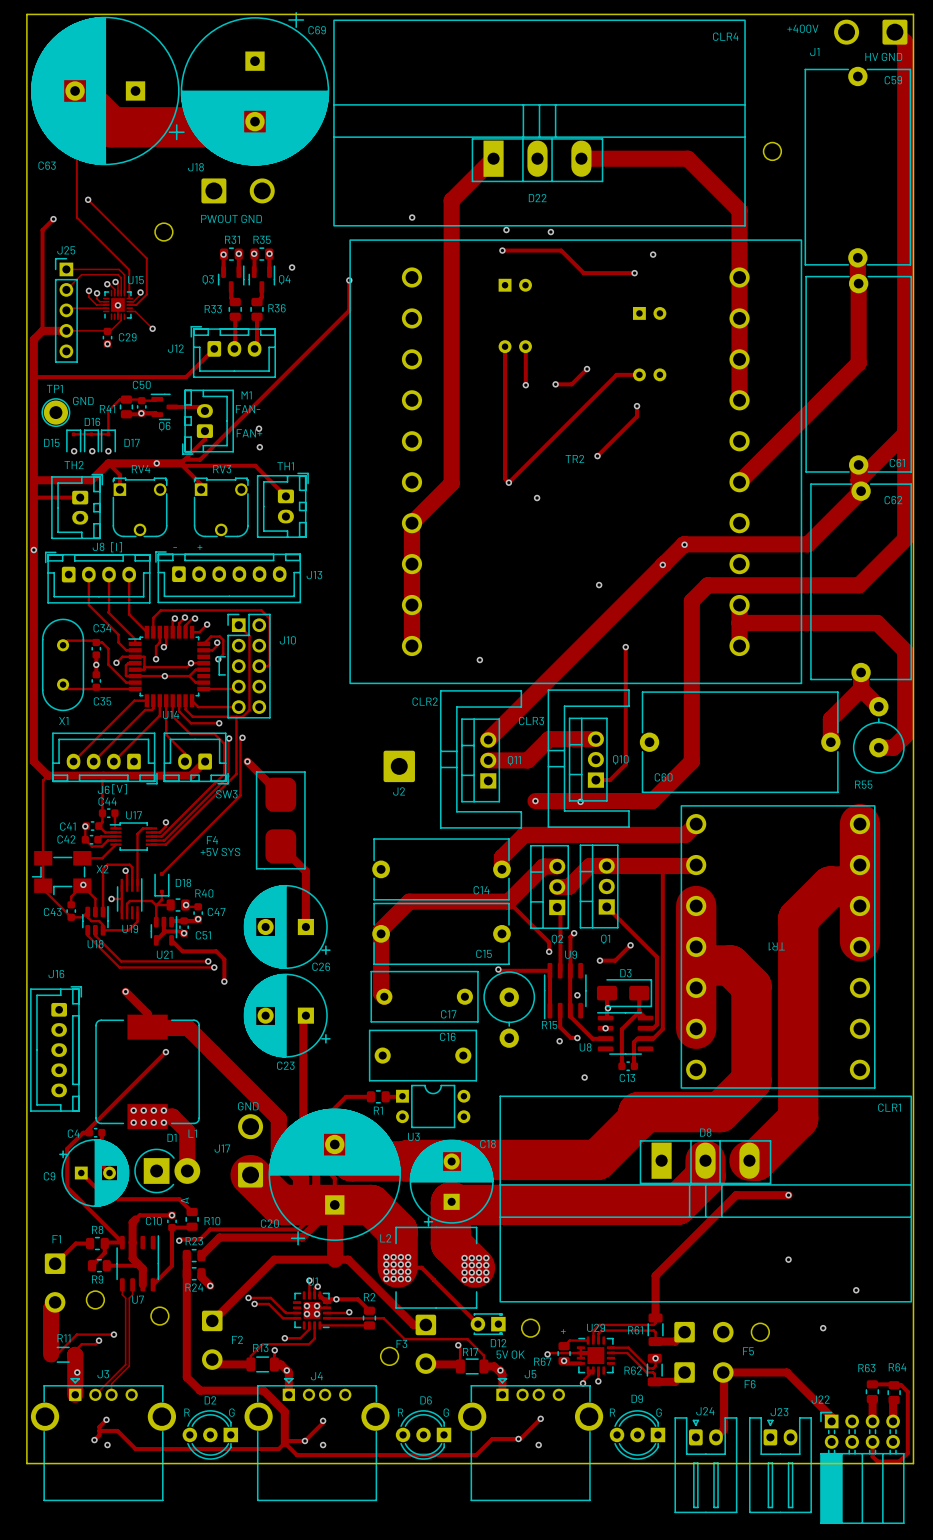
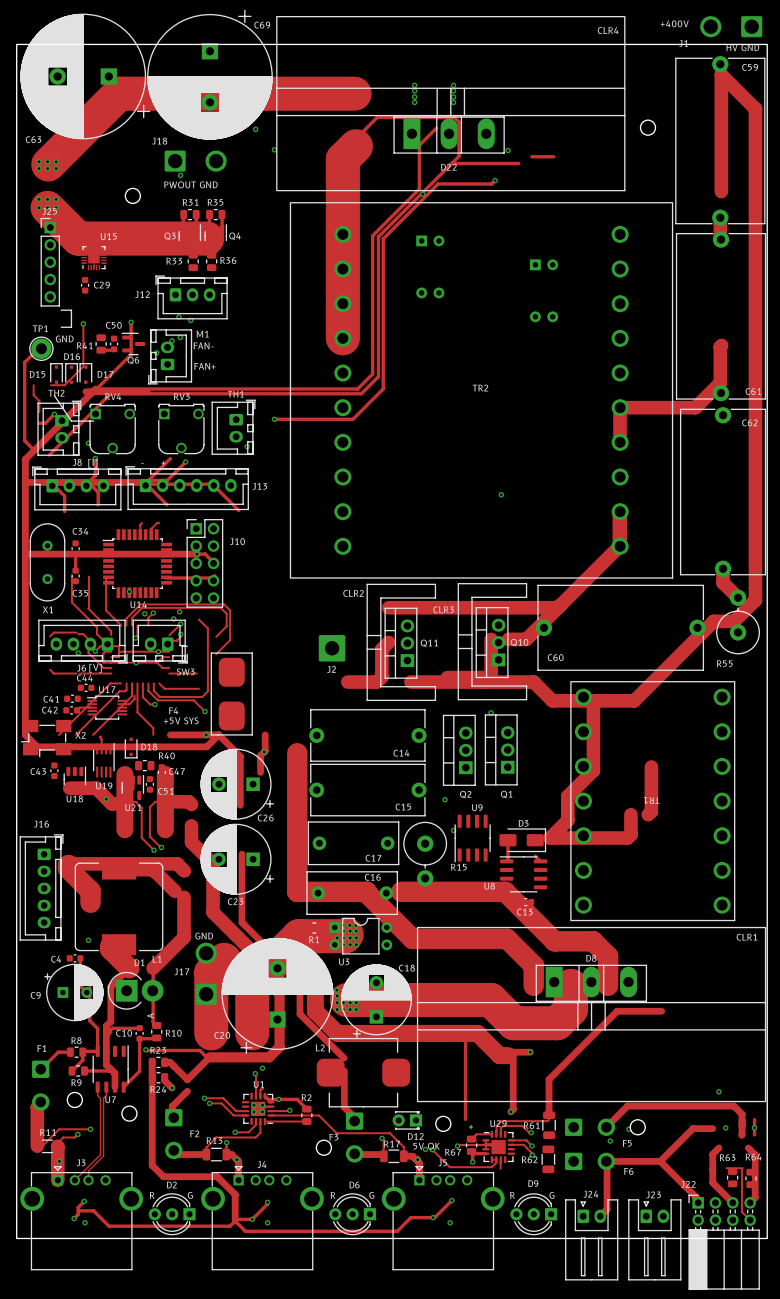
track: (894, 32) (905, 42) (905, 539) (859, 585) (707, 585) (691, 601) (691, 761) (652, 801) (581, 801) -> none
track: (75, 90) (111, 127) (249, 127) (254, 121) -> none
via: none -> (414, 85)
via: none -> (453, 85)
via: none -> (414, 90)
via: none -> (453, 90)
track: none -> (354, 93) (119, 93) (48, 164)
via: none -> (414, 96)
via: none -> (453, 96)
via: none -> (414, 102)
via: none -> (453, 102)
track: none -> (436, 117) (377, 117) (348, 146)
track: (76, 144) (76, 217) (129, 269) (129, 298) -> none
track: none -> (436, 128) (419, 145) (419, 189) (372, 235) (372, 373) (357, 389) (96, 389) (131, 354) (131, 322)
via: none -> (255, 129)
track: (493, 158) (451, 200) (451, 483) (411, 523) (411, 645) -> none
track: (581, 158) (687, 158) (739, 210) (739, 400) -> none
track: none -> (355, 146) (342, 159) (342, 338)
via: none -> (274, 149)
via: none -> (508, 150)
track: none -> (531, 156) (553, 156)
via: none -> (39, 161)
via: none -> (47, 161)
via: none -> (56, 161)
track: none -> (452, 163) (518, 163)
via: none -> (39, 168)
via: none -> (47, 168)
via: none -> (56, 168)
via: (88, 199) -> none
track: (88, 200) (146, 258) (146, 294) (136, 304) (129, 304) -> none
via: none -> (180, 175)
track: none -> (495, 180) (491, 183) (438, 183) (383, 238) (383, 389) (352, 419) (274, 419)
via: none -> (495, 180)
via: (412, 217) -> none
track: (53, 219) (42, 230) (42, 330) -> none
via: (53, 219) -> none
track: none -> (721, 191) (721, 74) (755, 108) (755, 600) (734, 621) (713, 621) (634, 700) (552, 700) (533, 682) (410, 682)
via: (550, 232) -> none
via: none -> (39, 199)
via: none -> (47, 199)
via: none -> (56, 199)
via: none -> (39, 207)
track: none -> (47, 207) (78, 238) (207, 238)
via: none -> (47, 207)
via: none -> (56, 207)
track: (502, 250) (561, 250) (583, 273) (634, 273) -> none
via: (502, 250) -> none
via: (238, 253) -> none
via: (254, 253) -> none
via: (269, 253) -> none
via: (223, 254) -> none
via: (653, 254) -> none
via: (292, 267) -> none
track: (66, 269) (119, 269) (124, 274) (124, 293) -> none
via: (634, 273) -> none
track: (349, 280) (349, 310) (200, 459) (184, 459) -> none
via: (349, 280) -> none
via: (115, 282) -> none
track: (117, 282) (115, 282) (117, 282) (117, 293) -> none
track: (858, 283) (858, 363) (739, 482) -> none
track: (107, 284) (114, 289) (114, 293) -> none
via: (107, 284) -> none
track: (66, 289) (81, 274) (117, 274) (121, 277) (121, 293) -> none
track: (88, 290) (88, 297) (96, 304) (106, 304) -> none
via: (88, 290) -> none
track: (140, 292) (133, 301) (129, 301) -> none
via: (140, 292) -> none
track: (97, 293) (97, 298) (99, 301) (106, 301) -> none
via: (97, 293) -> none
via: (117, 305) -> none
track: (68, 308) (106, 308) -> none
track: (129, 311) (135, 311) (152, 328) -> none
track: (121, 316) (121, 320) (110, 330) (42, 330) -> none
track: (235, 316) (235, 348) -> none
track: (257, 316) (257, 346) -> none
via: (152, 328) -> none
track: (42, 330) (33, 339) (33, 761) (47, 775) -> none
via: (107, 344) -> none
track: (505, 346) (505, 478) (508, 482) (616, 374) (639, 374) -> none
track: (525, 346) (525, 385) -> none
track: (214, 348) (186, 377) (33, 377) -> none
line: none -> (61, 310) (71, 310) (71, 327) (61, 327)
track: (587, 369) (571, 384) (555, 384) -> none
via: (587, 369) -> none
via: none -> (178, 317)
via: none -> (190, 320)
via: none -> (131, 322)
track: none -> (83, 323) (83, 366) (64, 385) (50, 385)
via: none -> (83, 323)
via: (555, 384) -> none
via: (525, 385) -> none
track: (140, 399) (119, 399) (108, 410) (108, 434) (73, 434) -> none
track: (157, 399) (141, 400) -> none
via: none -> (180, 337)
via: none -> (172, 340)
track: (172, 406) (200, 406) (204, 410) -> none
track: (637, 406) (637, 416) (597, 456) -> none
via: (637, 406) -> none
track: none -> (721, 345) (720, 382) (695, 407) (620, 407) (620, 442)
track: (141, 413) (157, 414) -> none
via: (141, 413) -> none
via: none -> (156, 352)
track: none -> (33, 353) (24, 362) (24, 440) (34, 450)
via: (259, 428) -> none
track: (905, 433) (858, 480) -> none
track: (205, 435) (205, 439) (180, 463) (183, 465) -> (49, 455) (110, 393) (149, 393)
via: (259, 447) -> none
via: (74, 451) -> none
via: (92, 451) -> none
via: (108, 451) -> none
track: none -> (33, 385) (33, 395) (39, 400) (39, 412)
via: (597, 456) -> none
track: none -> (95, 389) (25, 459) (25, 734) (37, 746) (206, 746) (218, 734)
via: (156, 463) -> none
track: (180, 463) (201, 484) (201, 489) -> none
track: (858, 464) (858, 488) (861, 491) (807, 544) (683, 544) (488, 739) -> none
track: (255, 465) (285, 496) -> (210, 393) (361, 393) (378, 376) (378, 236) (458, 156) (458, 122) (454, 117) (436, 117)
line: none -> (54, 395) (71, 421) (93, 421)
track: (35, 480) (91, 480) (108, 463) (119, 474) (119, 489) -> none
via: (508, 482) -> none
track: none -> (54, 414) (45, 423) (39, 423)
via: none -> (54, 414)
track: (34, 495) (36, 497) (80, 497) -> none
via: none -> (274, 419)
via: (537, 498) -> none
via: none -> (88, 443)
via: none -> (247, 446)
track: none -> (95, 458) (95, 475) (88, 482) (98, 492) (98, 504)
via: none -> (95, 458)
track: none -> (170, 458) (146, 482)
via: (684, 544) -> none
track: none -> (185, 462) (167, 480) (151, 480) (149, 482)
via: none -> (185, 462)
via: (33, 549) -> none
via: (662, 564) -> none
track: none -> (25, 482) (149, 482)
track: none -> (50, 482) (64, 496) (64, 511)
track: none -> (144, 482) (166, 504)
track: none -> (149, 482) (151, 484) (212, 484) (238, 510)
track: (88, 574) (88, 605) (118, 634) (118, 642) (126, 650) (135, 650) -> (71, 576) (71, 602) (97, 627) (97, 634) (103, 640) (111, 640)
track: (109, 574) (108, 612) (135, 639) (135, 643) -> (89, 576) (88, 608) (111, 631) (111, 635)
track: (129, 574) (129, 614) (146, 632) -> (106, 576) (106, 610) (121, 625)
track: none -> (619, 512) (619, 546) (526, 639) (508, 639)
track: (184, 617) (179, 623) (179, 632) -> (153, 613) (148, 617) (148, 625)
via: (184, 617) -> none
via: (174, 618) -> none
via: (195, 618) -> none
track: (739, 622) (877, 622) (905, 650) (905, 735) (893, 747) (878, 747) -> none
track: (207, 624) (199, 632) (192, 632) -> none
via: (207, 624) -> none
track: (238, 625) (249, 635) (249, 710) (242, 716) (192, 716) (185, 709) (185, 700) -> (198, 619) (207, 628) (207, 691) (202, 696) (159, 696) (153, 690) (153, 683)
track: (153, 632) (153, 617) (160, 610) (261, 610) (269, 618) (269, 664) (259, 666) -> none
track: (159, 632) (159, 642) (156, 646) (156, 659) -> none
track: (166, 632) (166, 644) (163, 647) -> (137, 625) (137, 636) (135, 638)
track: (94, 640) (67, 640) (63, 645) -> (76, 632) (54, 632) (50, 636)
track: (96, 642) (102, 642) (108, 648) (108, 664) (126, 682) (135, 682) -> (78, 634) (83, 634) (88, 639) (88, 652) (103, 668) (111, 668)
track: (217, 642) (217, 645) (212, 650) (203, 650) -> (180, 634) (176, 640) (169, 640)
via: (217, 642) -> none
track: (203, 643) (210, 636) (219, 636) (223, 639) (223, 654) (218, 659) -> none
via: (163, 647) -> none
track: (625, 647) (625, 764) (610, 780) (595, 780) -> none
via: (625, 647) -> none
track: none -> (25, 554) (205, 554) (214, 563)
via: none -> (196, 554)
line: (225, 656) (219, 656) (219, 674) (225, 674) -> (187, 646) (182, 646) (182, 661) (187, 661)
via: (156, 659) -> none
via: (218, 659) -> none
via: (479, 660) -> none
track: (116, 662) (122, 656) (144, 656) (144, 669) (135, 669) -> (95, 651) (100, 646) (118, 646) (119, 656) (111, 657)
via: (116, 662) -> none
track: (135, 663) (128, 663) (125, 665) (126, 676) (189, 676) -> (111, 651) (103, 653) (103, 662) (157, 662)
via: (191, 663) -> none
track: (203, 663) (191, 663) (186, 667) (144, 667) -> none
via: (96, 664) -> none
track: (203, 669) (195, 669) (189, 676) -> (169, 657) (162, 657) (157, 662)
via: (164, 676) -> none
track: (189, 676) (195, 682) (203, 682) -> (157, 662) (162, 668) (169, 668)
track: none -> (214, 575) (212, 578) (166, 578)
track: (63, 684) (67, 689) (94, 689) -> (50, 669) (53, 673) (76, 673)
track: (98, 689) (135, 689) -> (79, 673) (111, 673)
track: (203, 689) (236, 689) -> (169, 673) (196, 673)
track: (861, 689) (830, 719) (830, 742) -> none
via: none -> (129, 591)
track: (146, 700) (134, 700) (73, 761) -> (121, 683) (110, 683) (58, 734)
track: (153, 700) (153, 708) (145, 709) (93, 761) -> (126, 683) (126, 690) (119, 691) (76, 734)
track: (159, 700) (159, 715) (113, 761) -> (131, 683) (131, 696) (93, 734)
track: (166, 700) (166, 734) (184, 753) (184, 761) -> (137, 683) (137, 712) (153, 728) (153, 734)
track: (172, 700) (172, 716) (190, 733) (214, 733) (224, 743) (224, 774) (161, 836) (151, 836) -> none
track: (179, 700) (179, 711) (191, 723) (219, 723) -> none
track: (192, 700) (198, 707) (238, 707) -> (159, 683) (164, 688) (198, 688)
track: (236, 716) (236, 774) (165, 844) (151, 844) -> none
track: none -> (388, 607) (558, 607)
via: none -> (153, 613)
via: none -> (144, 613)
via: none -> (173, 618)
track: none -> (180, 624) (169, 635)
via: none -> (180, 624)
track: (242, 737) (240, 739) (240, 795) (161, 873) -> none
via: (242, 737) -> none
track: (229, 738) (228, 776) (164, 840) (151, 840) -> none
via: (229, 738) -> none
track: none -> (126, 625) (126, 618) (140, 604) (224, 604) (230, 610) (230, 640) (216, 654)
track: none -> (131, 625) (131, 617) (142, 607) (220, 607) (226, 613) (226, 626) (216, 636)
track: (595, 739) (549, 739) (527, 760) (488, 760) -> none
via: none -> (180, 634)
via: none -> (135, 638)
track: none -> (491, 639) (491, 676) (485, 682)
track: none -> (388, 642) (381, 649) (381, 676) (376, 682) (347, 682)
track: (205, 761) (191, 775) (47, 775) -> none
track: (247, 761) (280, 794) -> none
via: (247, 761) -> none
via: none -> (95, 651)
track: none -> (119, 651) (169, 651)
via: none -> (158, 651)
via: none -> (78, 653)
track: (47, 775) (43, 780) (43, 885) -> none
track: (103, 775) (102, 822) (98, 826) (105, 832) (115, 832) -> none
via: none -> (136, 662)
via: (535, 801) -> none
via: (580, 801) -> none
track: none -> (142, 683) (142, 697) (150, 704) (154, 704)
track: none -> (148, 683) (148, 690) (157, 700) (193, 700) (204, 711)
track: (114, 813) (115, 828) -> none
via: (165, 822) -> none
track: (696, 824) (685, 834) (524, 834) (501, 857) (501, 869) -> none
track: (859, 824) (859, 941) -> none
via: (85, 826) -> none
track: (85, 827) (85, 839) (91, 846) (102, 846) (107, 840) (115, 840) -> none
track: (151, 828) (142, 828) (137, 833) (137, 885) -> none
track: none -> (593, 700) (593, 770) (567, 796) (567, 820) (550, 838) (627, 838) (630, 834) (630, 814)
via: none -> (154, 704)
via: none -> (204, 711)
via: none -> (491, 712)
track: (115, 844) (102, 858) (82, 858) -> none
track: (280, 846) (305, 871) (305, 926) -> none
track: (557, 866) (543, 866) (508, 901) -> none
track: (660, 866) (662, 868) (662, 1029) (653, 1038) (637, 1038) (634, 1042) (634, 1065) -> none
track: (695, 866) (589, 866) (568, 886) (557, 886) -> none
track: none -> (170, 734) (218, 734)
via: none -> (206, 734)
track: none -> (218, 734) (240, 756) (240, 805)
track: none -> (265, 734) (265, 750) (260, 755) (260, 772)
via: (125, 870) -> none
via: (83, 884) -> none
track: (121, 885) (121, 912) -> none
track: (132, 885) (132, 867) (129, 864) (107, 864) (103, 869) (103, 911) -> none
track: (859, 886) (830, 886) (798, 918) (798, 1118) (756, 1160) (749, 1160) -> none
via: none -> (264, 751)
track: (43, 889) (71, 917) (82, 917) (87, 911) (87, 917) (91, 921) (99, 921) (103, 924) (103, 930) (128, 930) (137, 921) (137, 912) -> none
track: none -> (297, 753) (297, 891) (366, 891) (412, 938) (507, 938) (533, 965) (533, 985)
track: (161, 891) (161, 899) (156, 905) -> none
track: (111, 898) (121, 898) -> none
via: (111, 898) -> none
track: (508, 901) (409, 901) (381, 929) (381, 993) (384, 996) -> none
track: (508, 901) (549, 942) (549, 951) -> none
track: (71, 904) (71, 896) (82, 885) (95, 898) (95, 911) -> none
track: (156, 905) (170, 905) -> none
track: (156, 905) (151, 900) (129, 900) (127, 903) (127, 912) -> none
track: (156, 905) (156, 922) -> none
via: (186, 905) -> none
track: (696, 905) (696, 1028) -> none
track: (187, 906) (198, 906) -> none
track: (606, 906) (656, 957) (656, 1024) (653, 1028) (645, 1028) -> none
track: none -> (651, 766) (651, 811) (648, 814)
track: (560, 910) (560, 970) -> none
track: none -> (124, 774) (124, 829)
track: none -> (165, 774) (165, 829)
via: (198, 919) -> none
track: (172, 920) (196, 920) -> none
track: (87, 930) (87, 935) (119, 967) (214, 967) -> none
track: (95, 930) (95, 935) (121, 961) (208, 961) -> none
track: none -> (69, 788) (96, 788) (111, 803) (124, 803)
track: (184, 933) (182, 931) (165, 931) (156, 940) -> none
via: (184, 933) -> none
track: (574, 933) (570, 936) (570, 970) -> none
via: (574, 933) -> none
track: (171, 940) (182, 951) (216, 951) (224, 959) (224, 981) -> none
via: none -> (106, 799)
via: none -> (445, 799)
track: (630, 945) (615, 960) (599, 960) -> none
via: (630, 945) -> none
track: none -> (124, 801) (135, 801) (141, 807) (141, 837) (154, 850)
track: none -> (191, 804) (188, 801) (155, 801) (149, 807) (149, 836) (160, 847)
via: (549, 951) -> none
via: (599, 960) -> none
via: (208, 961) -> none
track: (696, 965) (730, 965) (751, 986) (751, 1080) (720, 1112) (638, 1112) (638, 1118) (597, 1159) (351, 1161) (337, 1146) -> none
via: (214, 967) -> none
track: (498, 969) (549, 970) (549, 1010) -> none
via: (498, 969) -> none
track: (570, 973) (570, 1010) -> none
track: none -> (191, 825) (191, 842) (213, 863) (213, 912) (260, 959) (275, 959)
via: (224, 981) -> none
via: none -> (453, 830)
track: (125, 991) (147, 1013) (147, 1027) -> none
via: (125, 991) -> none
track: (639, 993) (639, 1011) (621, 1029) (621, 1066) -> none
via: (577, 995) -> none
via: none -> (161, 847)
via: none -> (154, 850)
via: (608, 1008) -> none
track: none -> (242, 854) (242, 922) (275, 956)
track: (560, 1010) (560, 1027) (570, 1038) (577, 1038) -> none
track: (570, 1010) (570, 1016) (592, 1038) (605, 1038) -> none
track: (303, 1018) (303, 1158) (316, 1170) (316, 1186) (334, 1204) -> none
track: none -> (76, 863) (177, 863) (184, 871)
track: none -> (68, 864) (68, 868) (90, 891) (90, 902)
via: (605, 1028) -> none
via: (577, 1038) -> none
via: (559, 1041) -> none
track: (165, 1052) (87, 1130) -> none
via: (165, 1052) -> none
track: (213, 1053) (278, 1118) (278, 1154) (300, 1177) (300, 1204) -> none
track: none -> (401, 891) (505, 891) (554, 941) (593, 941) (608, 956) (608, 985)
via: (584, 1077) -> none
via: none -> (343, 925)
via: none -> (349, 925)
via: none -> (355, 925)
via: none -> (343, 931)
via: none -> (350, 931)
via: none -> (356, 931)
track: none -> (346, 934) (345, 936) (298, 936) (275, 959)
via: none -> (337, 937)
via: none -> (343, 937)
via: none -> (350, 937)
via: none -> (356, 937)
via: (133, 1110) -> none
via: (143, 1110) -> none
via: (153, 1110) -> none
via: (163, 1110) -> none
via: none -> (88, 940)
track: (147, 1116) (172, 1116) (187, 1131) (187, 1170) -> none
via: none -> (343, 944)
via: none -> (350, 944)
via: none -> (356, 944)
track: none -> (110, 945) (110, 949) (129, 968) (110, 986) (110, 1021) (106, 1026) (106, 1034)
via: (133, 1122) -> none
via: (143, 1122) -> none
via: (153, 1122) -> none
via: (163, 1122) -> none
track: (89, 1132) (83, 1132) (67, 1148) (67, 1187) (122, 1242) -> none
track: none -> (224, 959) (211, 972) (211, 1033)
track: none -> (275, 959) (300, 984) (300, 1014) (344, 1058)
track: none -> (275, 959) (252, 982) (252, 1033)
track: none -> (275, 959) (294, 959) (315, 980) (315, 1011) (337, 1033) (477, 1033) (499, 1055) (508, 1055) (511, 1052) (530, 1052)
track: none -> (279, 963) (279, 1047) (269, 1057) (209, 1057)
track: (705, 1160) (705, 1176) (677, 1204) (454, 1204) (451, 1201) (450, 1243) (475, 1267) -> none
track: none -> (570, 985) (570, 1009) (557, 1023) (513, 1023) (490, 1000) (346, 1000)
track: none -> (89, 987) (89, 1020) (97, 1028) (97, 1049)
via: none -> (336, 990)
track: (81, 1173) (107, 1199) (179, 1199) (187, 1207) -> (184, 897) (184, 937) (153, 968) (153, 1021)
track: (250, 1175) (280, 1204) (371, 1204) (397, 1231) (397, 1267) (421, 1267) (477, 1324) -> none
via: none -> (337, 995)
via: none -> (337, 1002)
via: none -> (343, 1002)
via: none -> (350, 1002)
via: none -> (356, 1002)
via: none -> (337, 1009)
via: none -> (343, 1009)
via: none -> (350, 1009)
via: none -> (356, 1009)
via: (788, 1195) -> none
track: (334, 1204) (323, 1204) (298, 1229) (210, 1229) (200, 1239) (179, 1240) -> (209, 1057) (206, 1057) (199, 1050) (145, 1049)
track: (334, 1204) (302, 1237) (219, 1237) (201, 1255) -> (209, 1057) (187, 1079) (170, 1062) (164, 1062)
via: (171, 1215) -> none
track: none -> (465, 1033) (465, 1119)
part: (335, 1243) -> none
via: none -> (530, 1052)
track: none -> (513, 1055) (513, 1109) (510, 1111)
via: (386, 1257) -> none
via: (393, 1257) -> none
via: (400, 1257) -> none
via: (408, 1257) -> none
via: (464, 1258) -> none
via: (471, 1258) -> none
via: (479, 1258) -> none
via: (486, 1258) -> none
via: (788, 1259) -> none
via: none -> (262, 1068)
via: (386, 1264) -> none
via: (393, 1264) -> none
via: (400, 1264) -> none
via: (408, 1264) -> none
track: none -> (344, 1070) (344, 1107) (355, 1118)
via: (464, 1265) -> none
via: (471, 1265) -> none
via: (479, 1265) -> none
via: (486, 1265) -> none
track: none -> (255, 1073) (256, 1083)
via: none -> (255, 1073)
via: (386, 1271) -> none
via: (393, 1271) -> none
via: (400, 1271) -> none
via: (408, 1271) -> none
via: (464, 1272) -> none
via: (471, 1272) -> none
via: (479, 1272) -> none
via: (486, 1272) -> none
via: (386, 1278) -> none
via: (393, 1278) -> none
via: (400, 1278) -> none
via: (408, 1278) -> none
via: (464, 1279) -> none
via: (471, 1279) -> none
via: (479, 1279) -> none
via: (486, 1279) -> none
via: (309, 1280) -> none
via: (317, 1286) -> none
track: none -> (187, 1091) (172, 1106) (172, 1120)
via: none -> (510, 1111)
track: (210, 1323) (274, 1259) (348, 1259) (413, 1324) (425, 1324) -> none
track: none -> (754, 1119) (754, 1134)
via: (823, 1328) -> none
track: none -> (608, 1125) (627, 1106) (733, 1106) (742, 1114) (741, 1135)
track: (624, 1330) (653, 1330) (655, 1341) (675, 1341) (684, 1332) -> (522, 1125) (531, 1132)
via: none -> (725, 1127)
via: none -> (754, 1127)
track: none -> (712, 1128) (693, 1128) (660, 1161)
via: none -> (628, 1129)
via: none -> (531, 1132)
track: (628, 1347) (649, 1368) (655, 1366) (655, 1358) -> (526, 1140) (532, 1146)
via: none -> (610, 1141)
track: (625, 1352) (646, 1372) (653, 1372) (654, 1381) (675, 1381) (684, 1372) -> (523, 1144) (532, 1155)
via: none -> (532, 1146)
via: none -> (425, 1149)
via: none -> (432, 1149)
via: (655, 1358) -> none
via: (564, 1360) -> none
track: none -> (472, 1152) (472, 1162)
via: none -> (532, 1155)
track: (593, 1370) (583, 1383) -> (496, 1159) (496, 1162) (491, 1167) (449, 1167) (432, 1149)
via: none -> (472, 1162)
track: none -> (726, 1168) (742, 1168)
via: (598, 1381) -> none
track: none -> (741, 1169) (741, 1211) (750, 1220)
via: (583, 1383) -> none
track: (872, 1384) (893, 1384) -> none
track: (894, 1385) (901, 1385) (907, 1391) (907, 1453) (899, 1461) (877, 1461) (872, 1456) (872, 1441) -> none
track: (872, 1399) (872, 1421) -> (718, 1147) (712, 1154) (712, 1182) (732, 1202)
track: (894, 1399) (893, 1421) -> (748, 1147) (755, 1154) (755, 1197) (750, 1202)
board edge: (26, 1463) (26, 14) (913, 14) (913, 1463) -> (16, 1238) (16, 44) (767, 44) (767, 1238)

